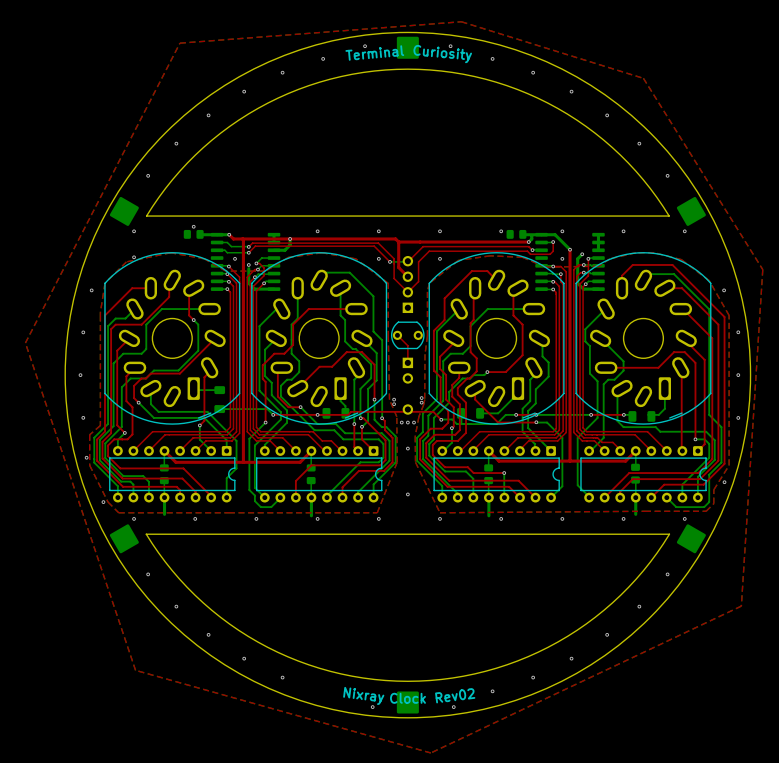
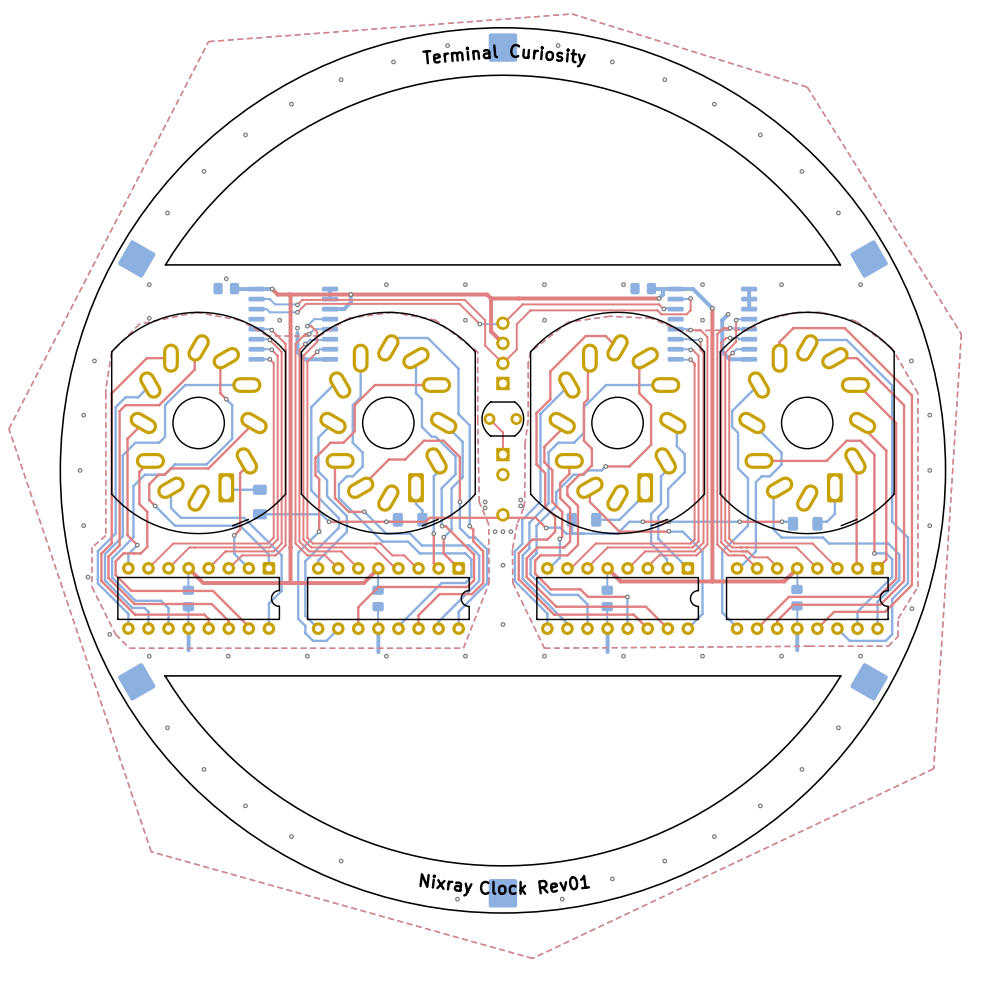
text: Rev02 (455, 695) -> Rev01 (564, 884)

